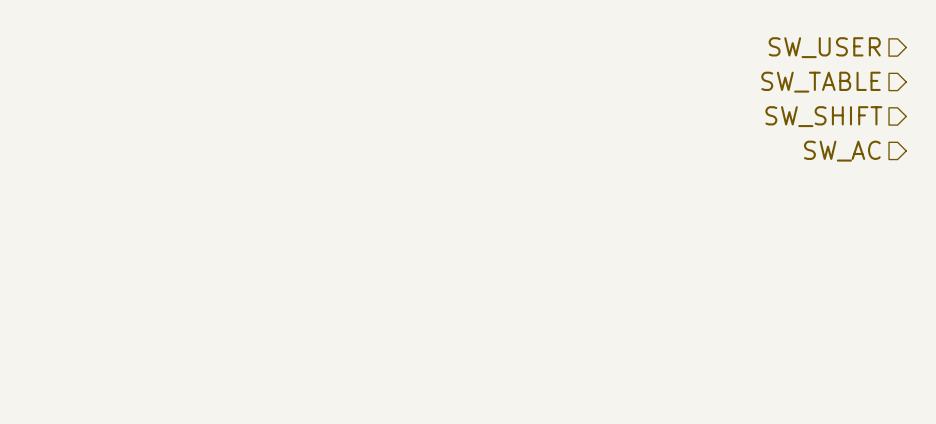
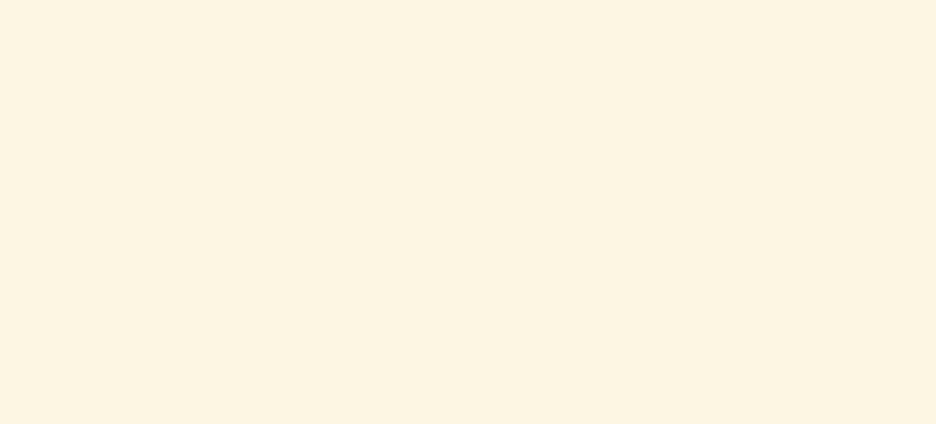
hierarchical label: SW_USER (824, 47) -> none
hierarchical label: SW_TABLE (821, 82) -> none
hierarchical label: SW_SHIFT (823, 116) -> none
hierarchical label: SW_AC (842, 151) -> none

